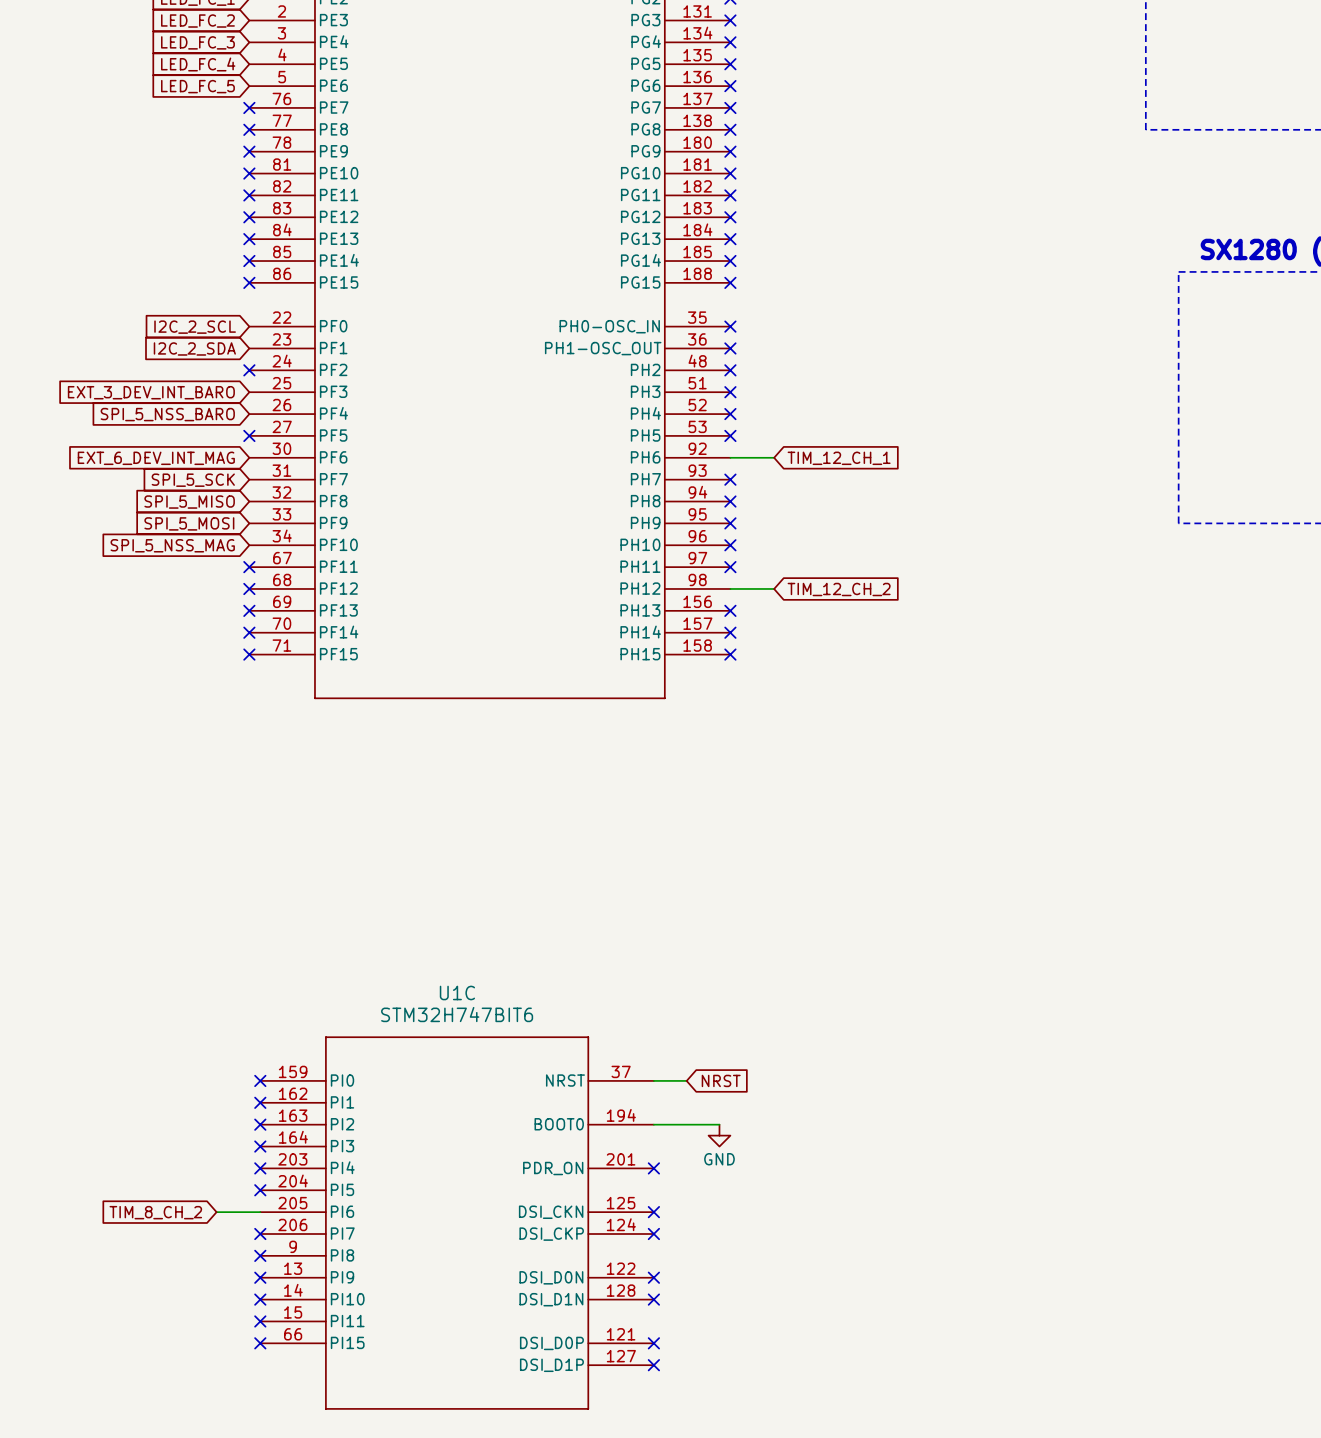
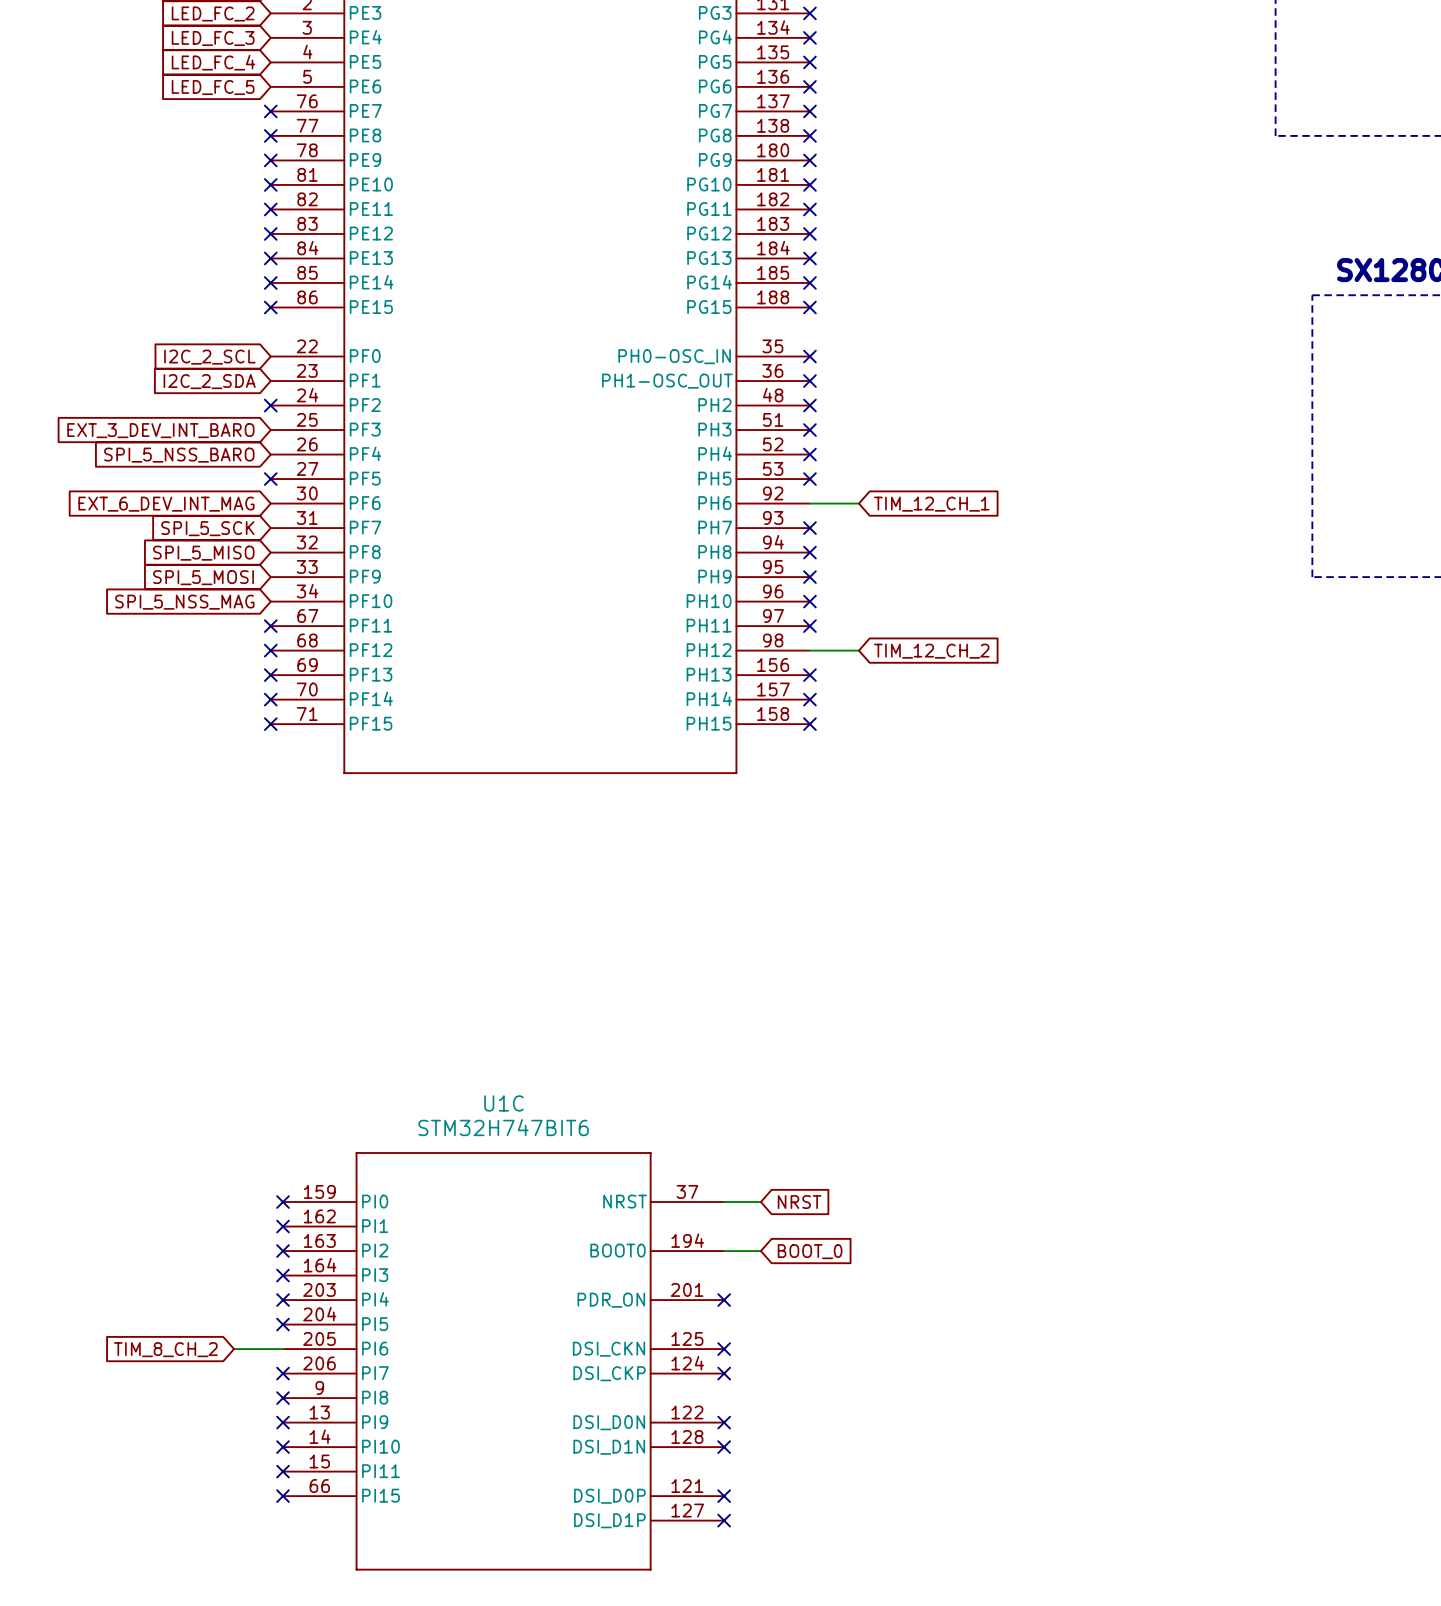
wire: (686, 1124) (719, 1124) -> none
global label: none -> BOOT_0 (810, 1251)
power symbol: GND (719, 1135) -> none

